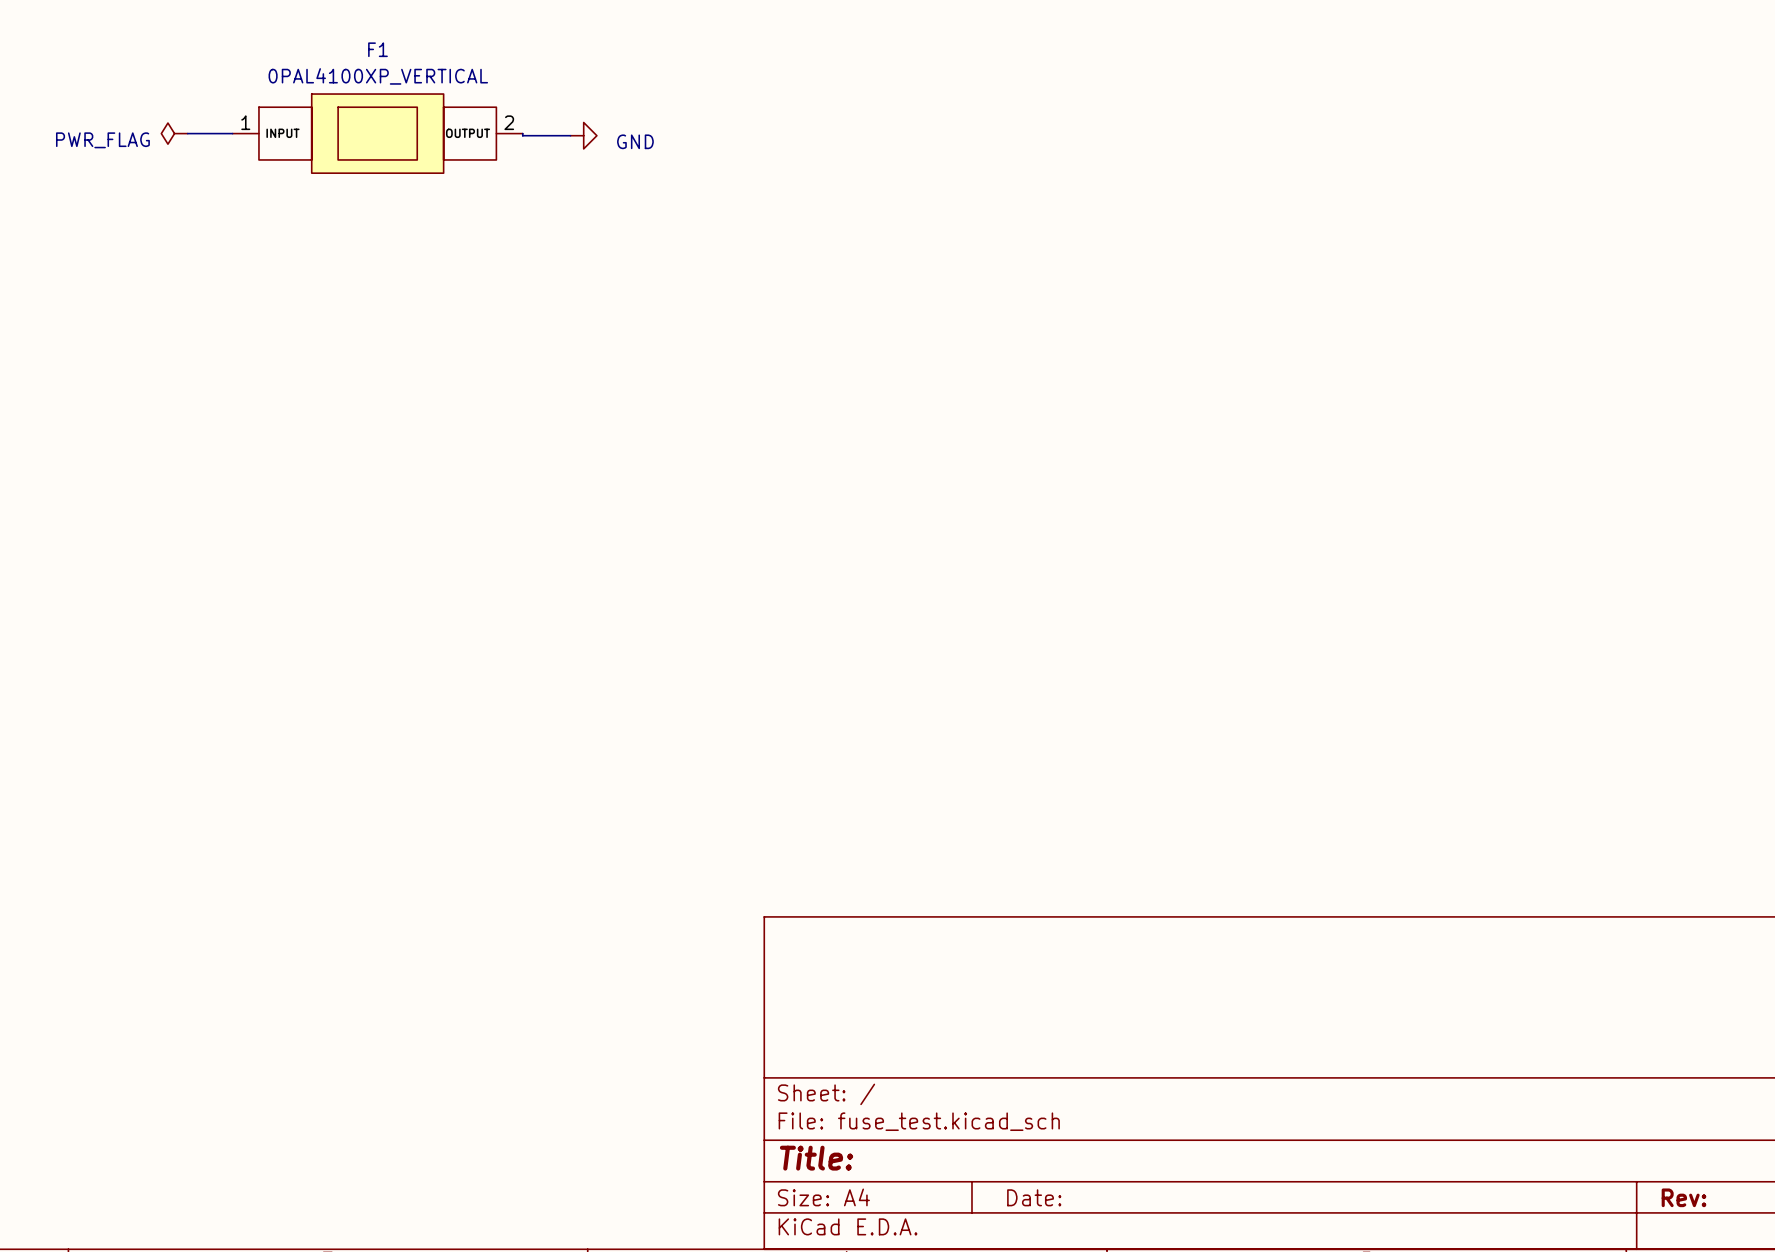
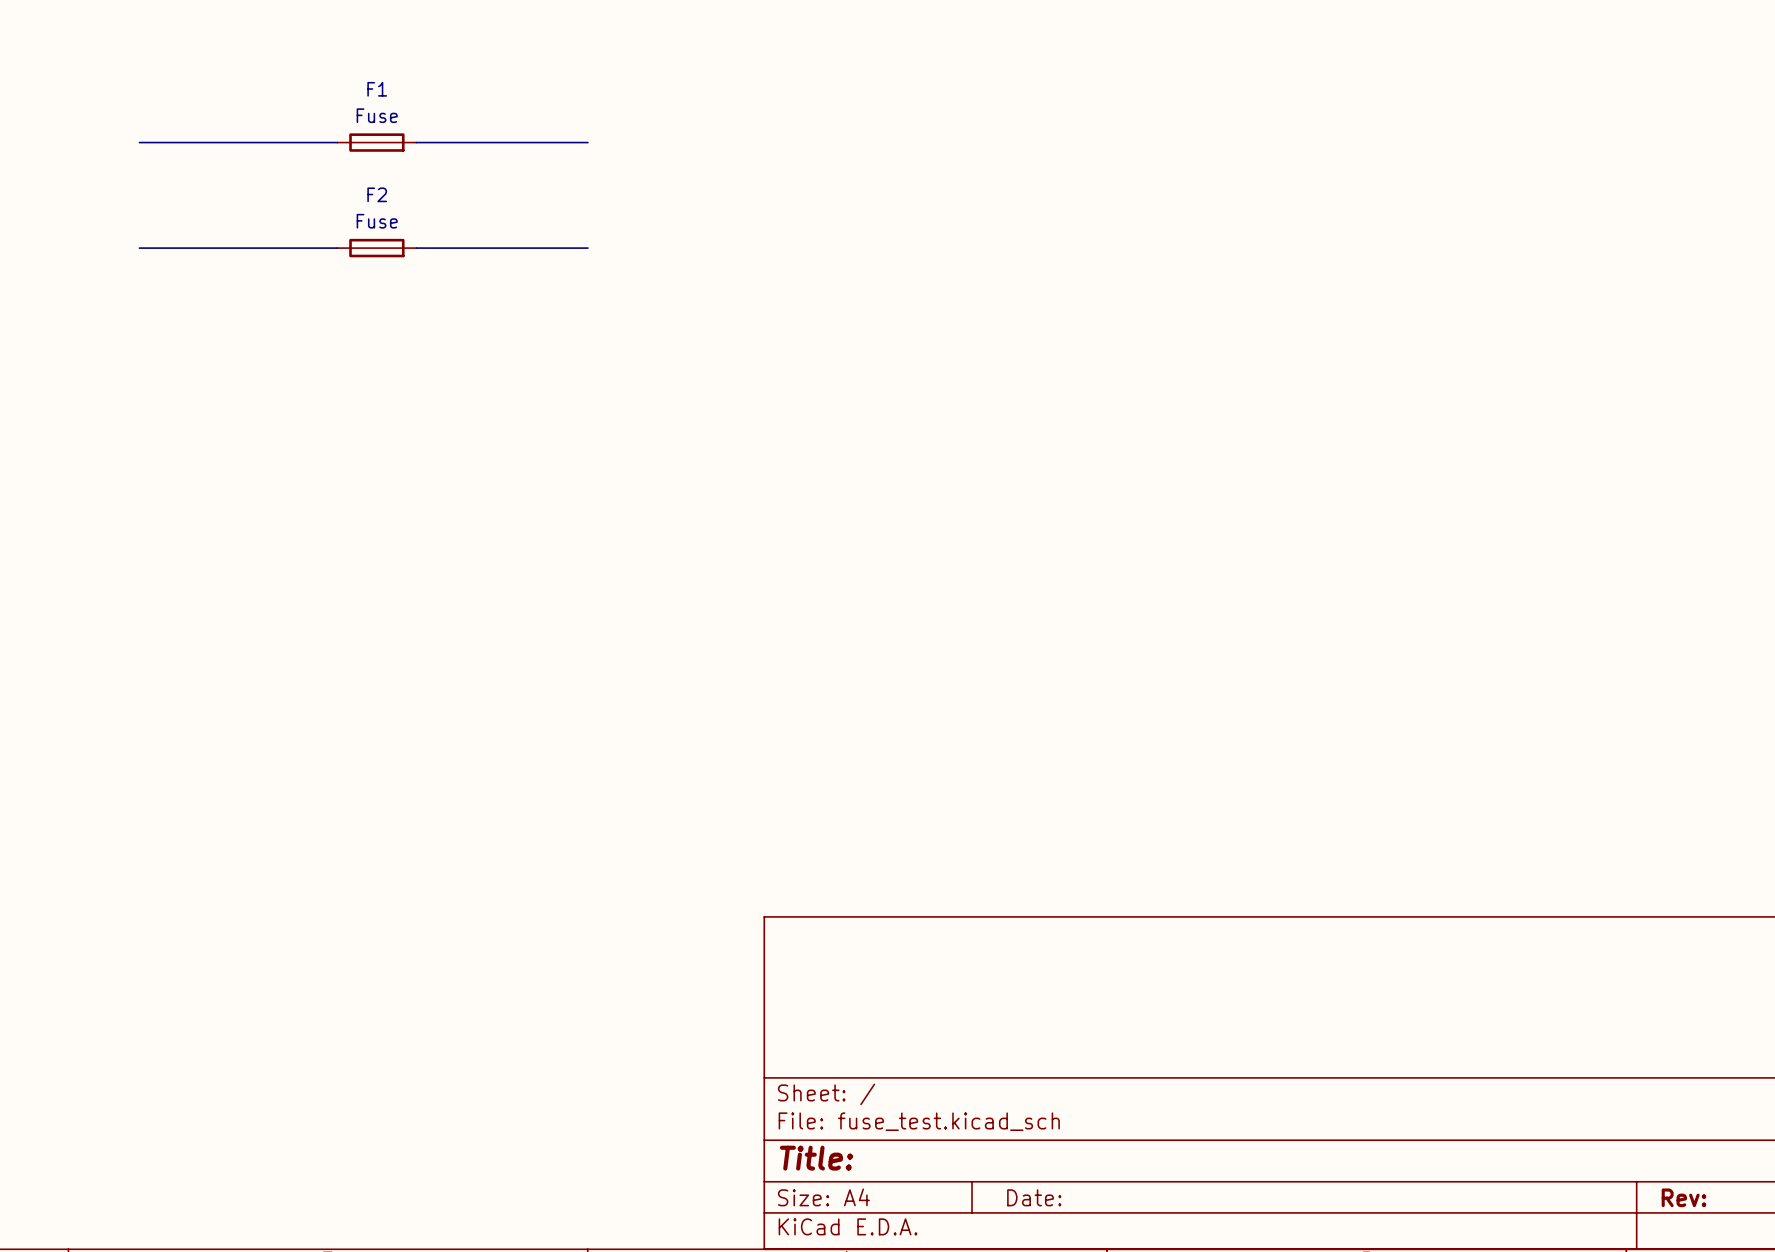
F1 name position: F1 (377, 49) -> F1 (377, 89)
F1 value: 0PAL4100XP_VERTICAL (378, 76) -> Fuse (377, 115)
F1 symbol: [232, 94, 523, 174] -> [337, 133, 417, 152]
power symbol: PWR_FLAG (174, 133) -> none
wire: (187, 133) (232, 133) -> none
wire: (522, 133) (522, 135) (570, 135) -> none
power symbol: GND (583, 135) -> none
wire: none -> (139, 142) (337, 142)
wire: none -> (416, 142) (587, 142)
wire: none -> (139, 248) (337, 248)
F2: none -> Fuse (376, 248)
wire: none -> (416, 248) (587, 248)

